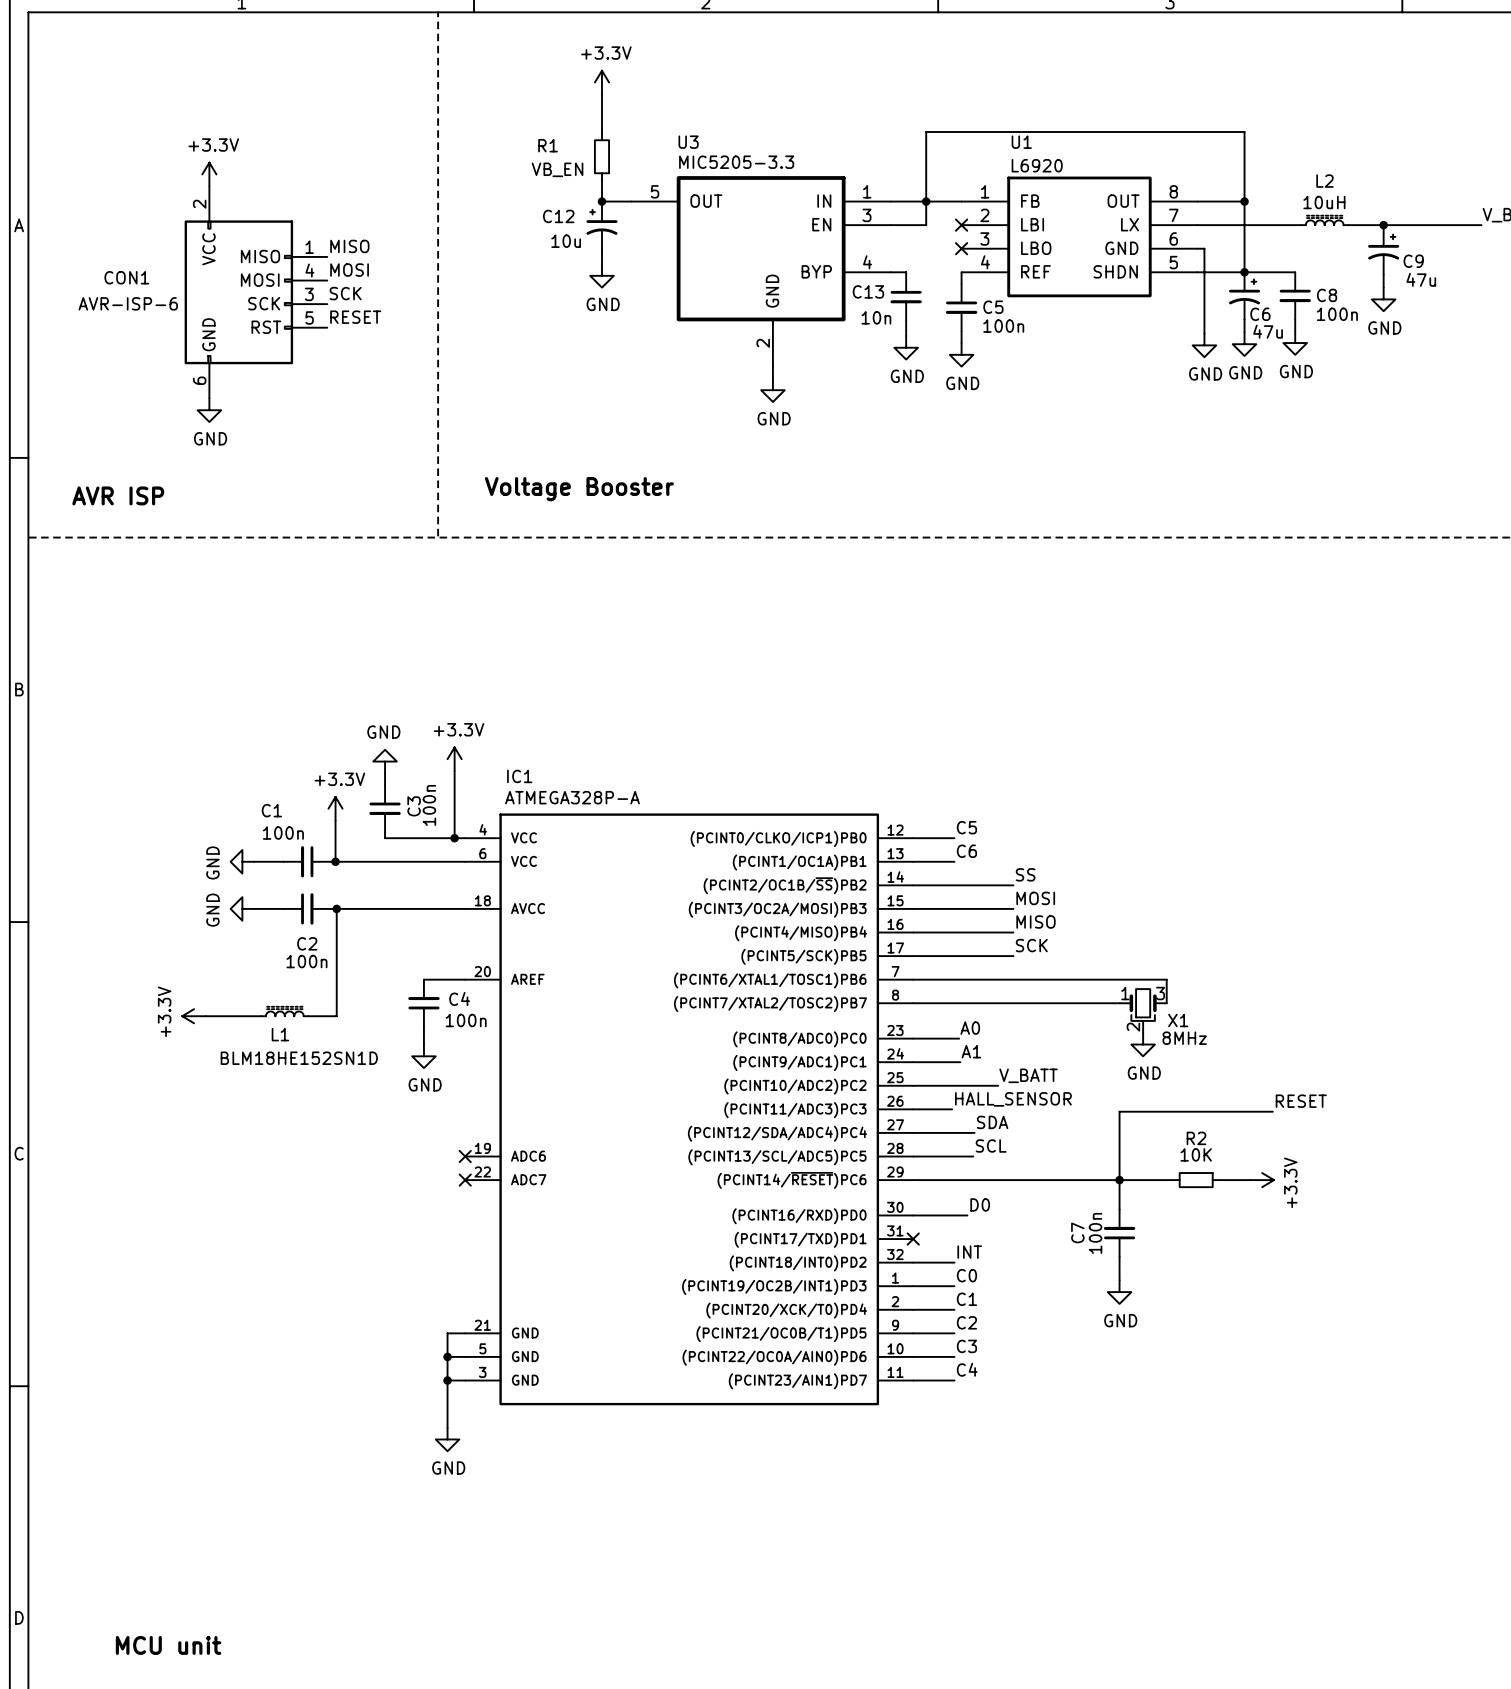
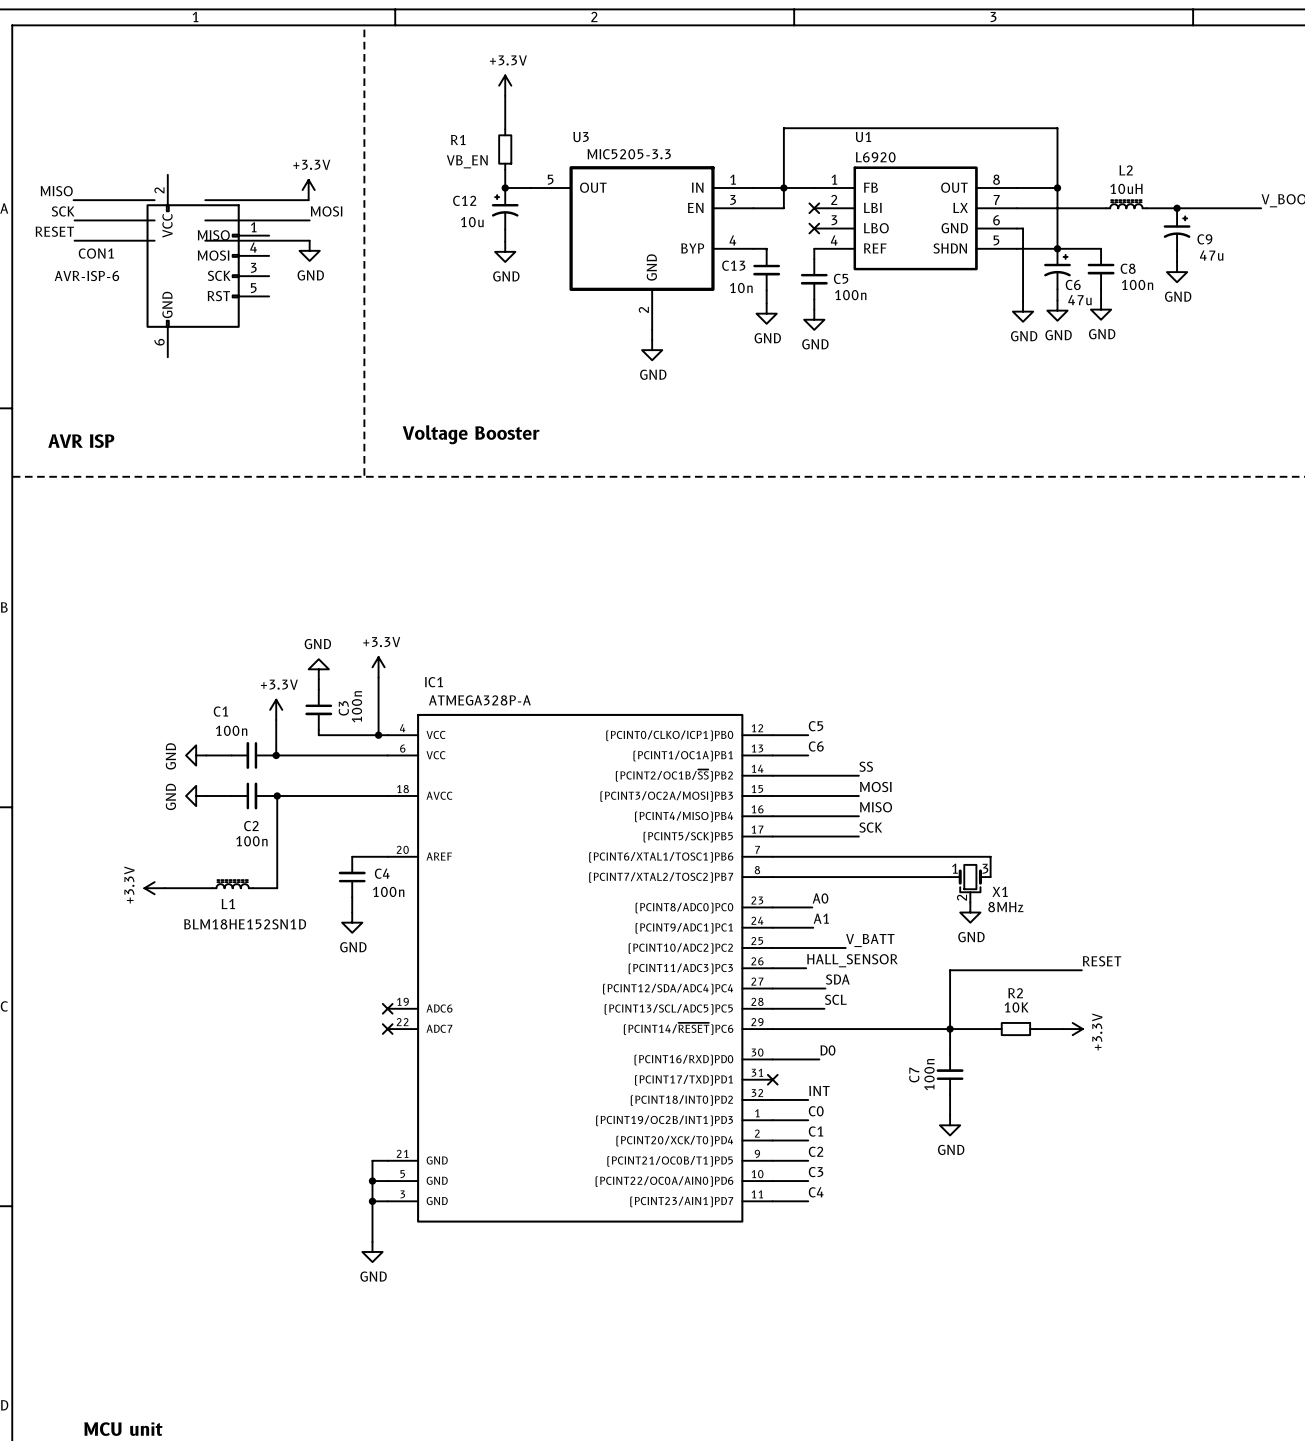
power symbol position: +3.3V (209, 174) -> +3.3V (308, 190)
wire: none -> (73, 200) (154, 200)
wire: none -> (205, 200) (308, 200)
label: none -> SCK (63, 211)
wire: none -> (74, 220) (154, 220)
wire: none -> (205, 220) (309, 220)
label position: MISO (349, 246) -> MISO (56, 191)
label: none -> RESET (54, 231)
wire: none -> (74, 240) (154, 240)
wire: none -> (205, 240) (309, 240)
label position: MOSI (349, 270) -> MOSI (326, 211)
label: SCK (345, 293) -> none
label: RESET (355, 317) -> none
power symbol position: GND (209, 410) -> GND (309, 250)

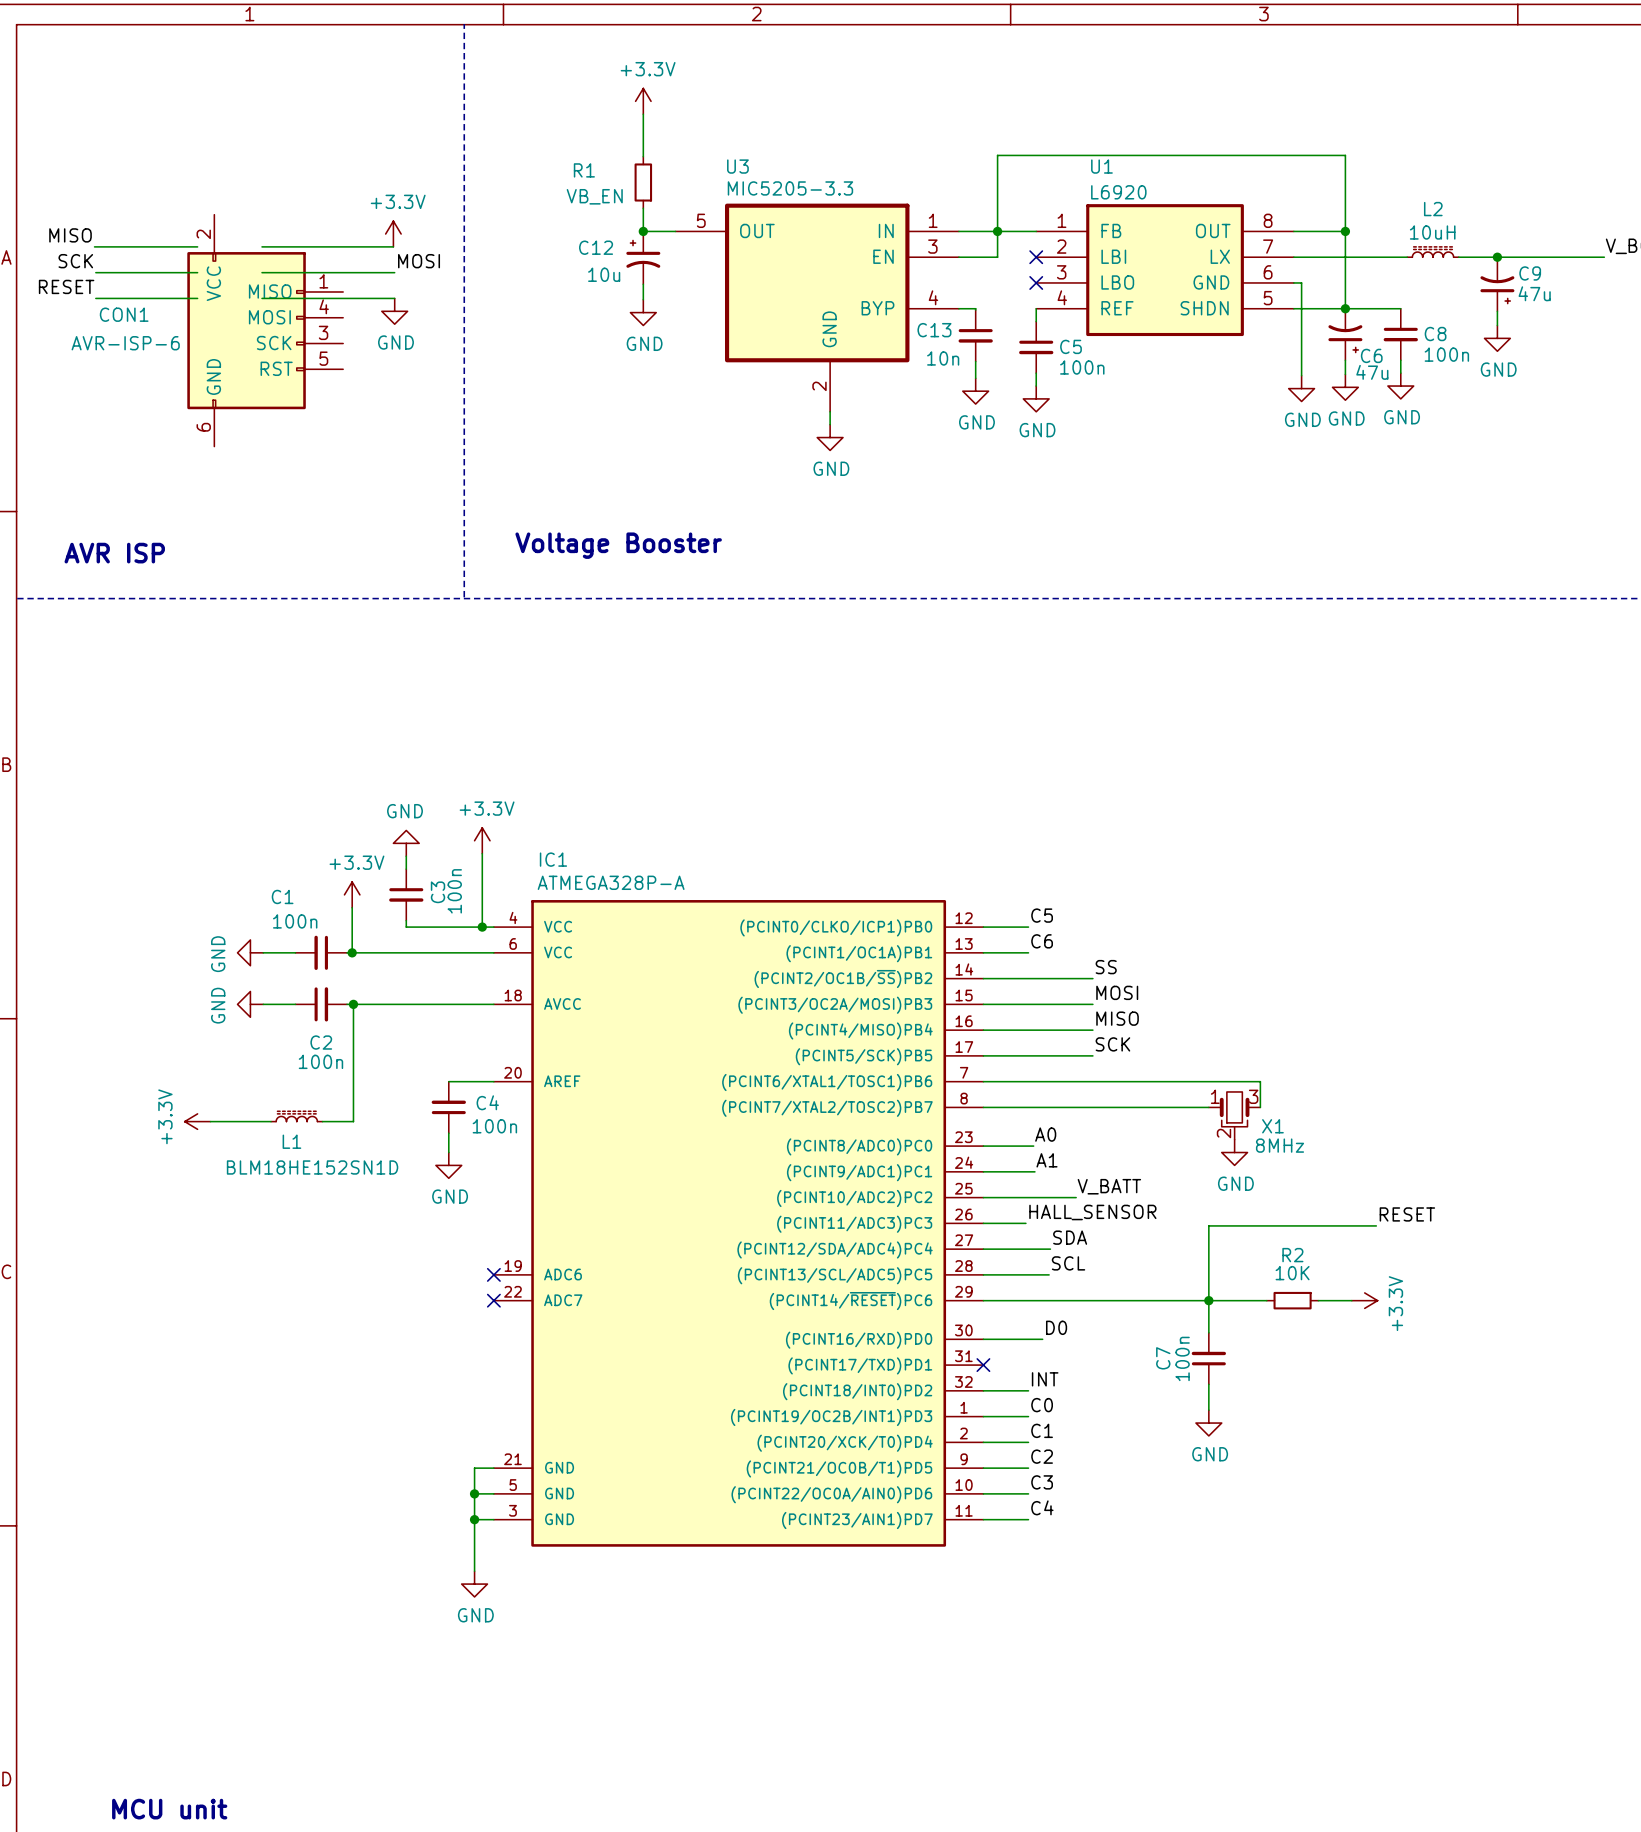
C9 flip: as is (1177, 227) -> up-down (1497, 289)
C9 value position: 47u (1211, 255) -> 47u (1534, 293)
C6 flip: as is (1057, 265) -> up-down (1345, 338)

